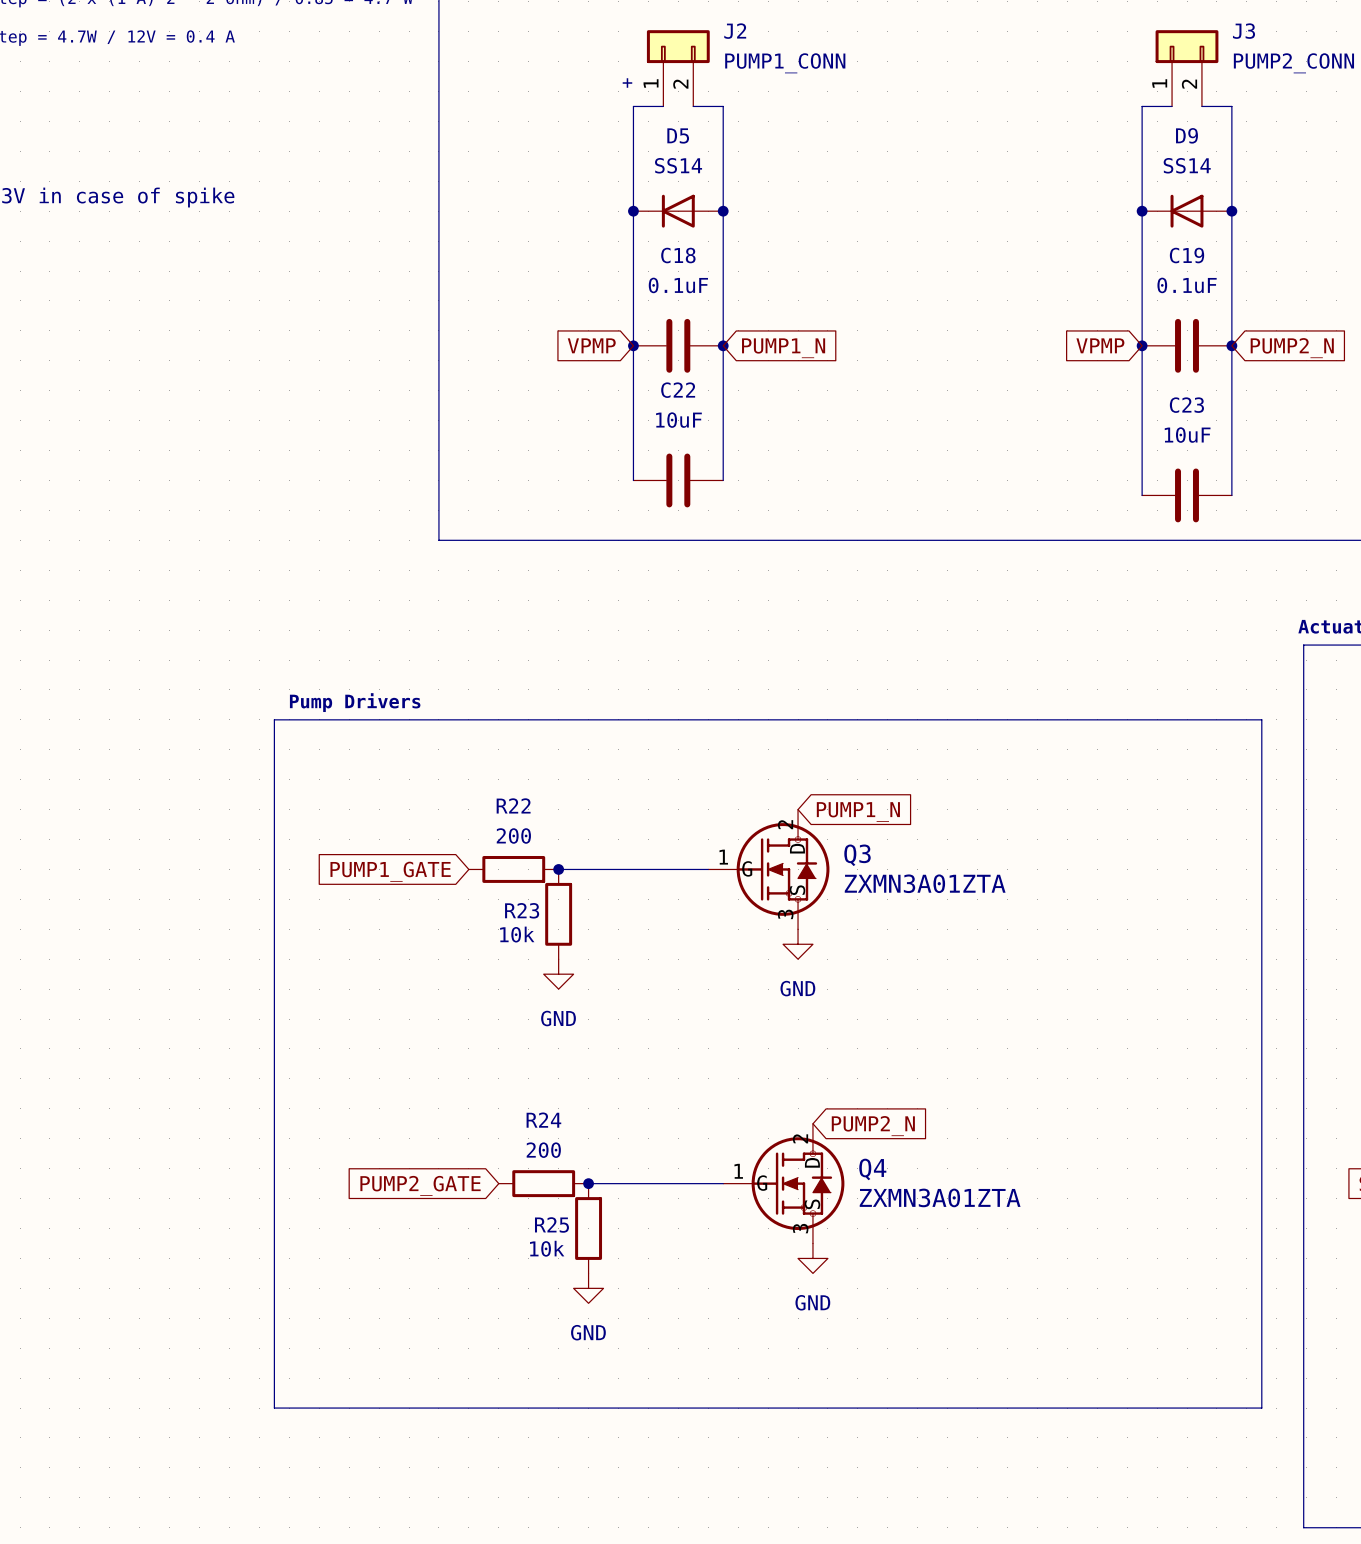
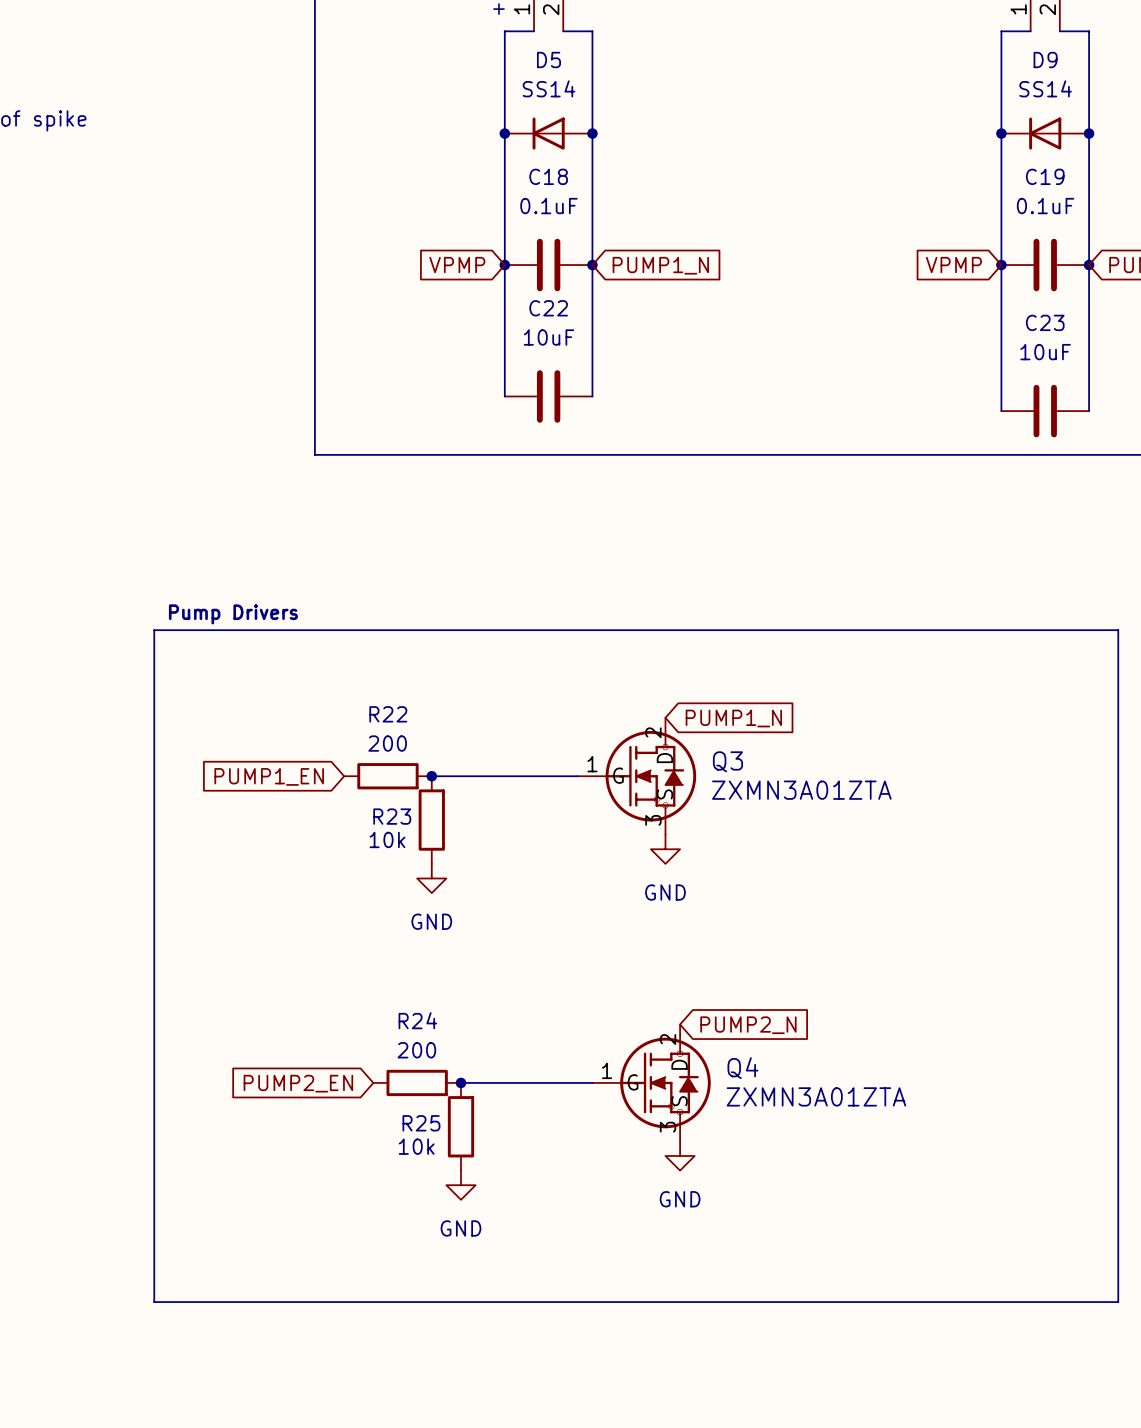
global label: PUMP1_GATE (390, 871) -> PUMP1_EN (269, 776)
global label: PUMP2_GATE (420, 1185) -> PUMP2_EN (298, 1083)

